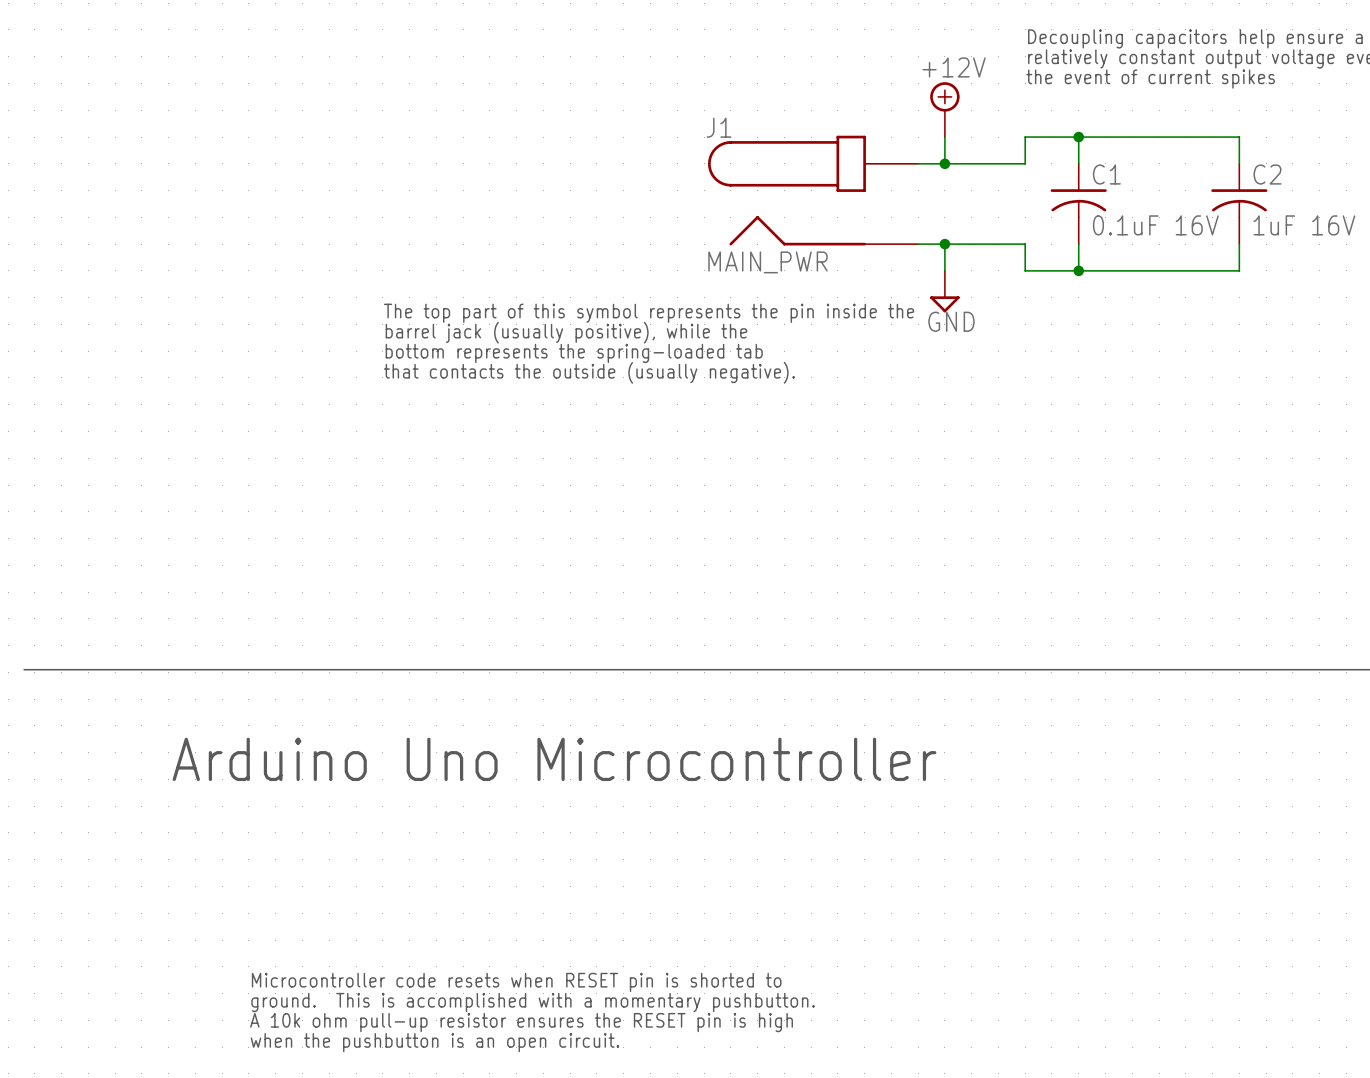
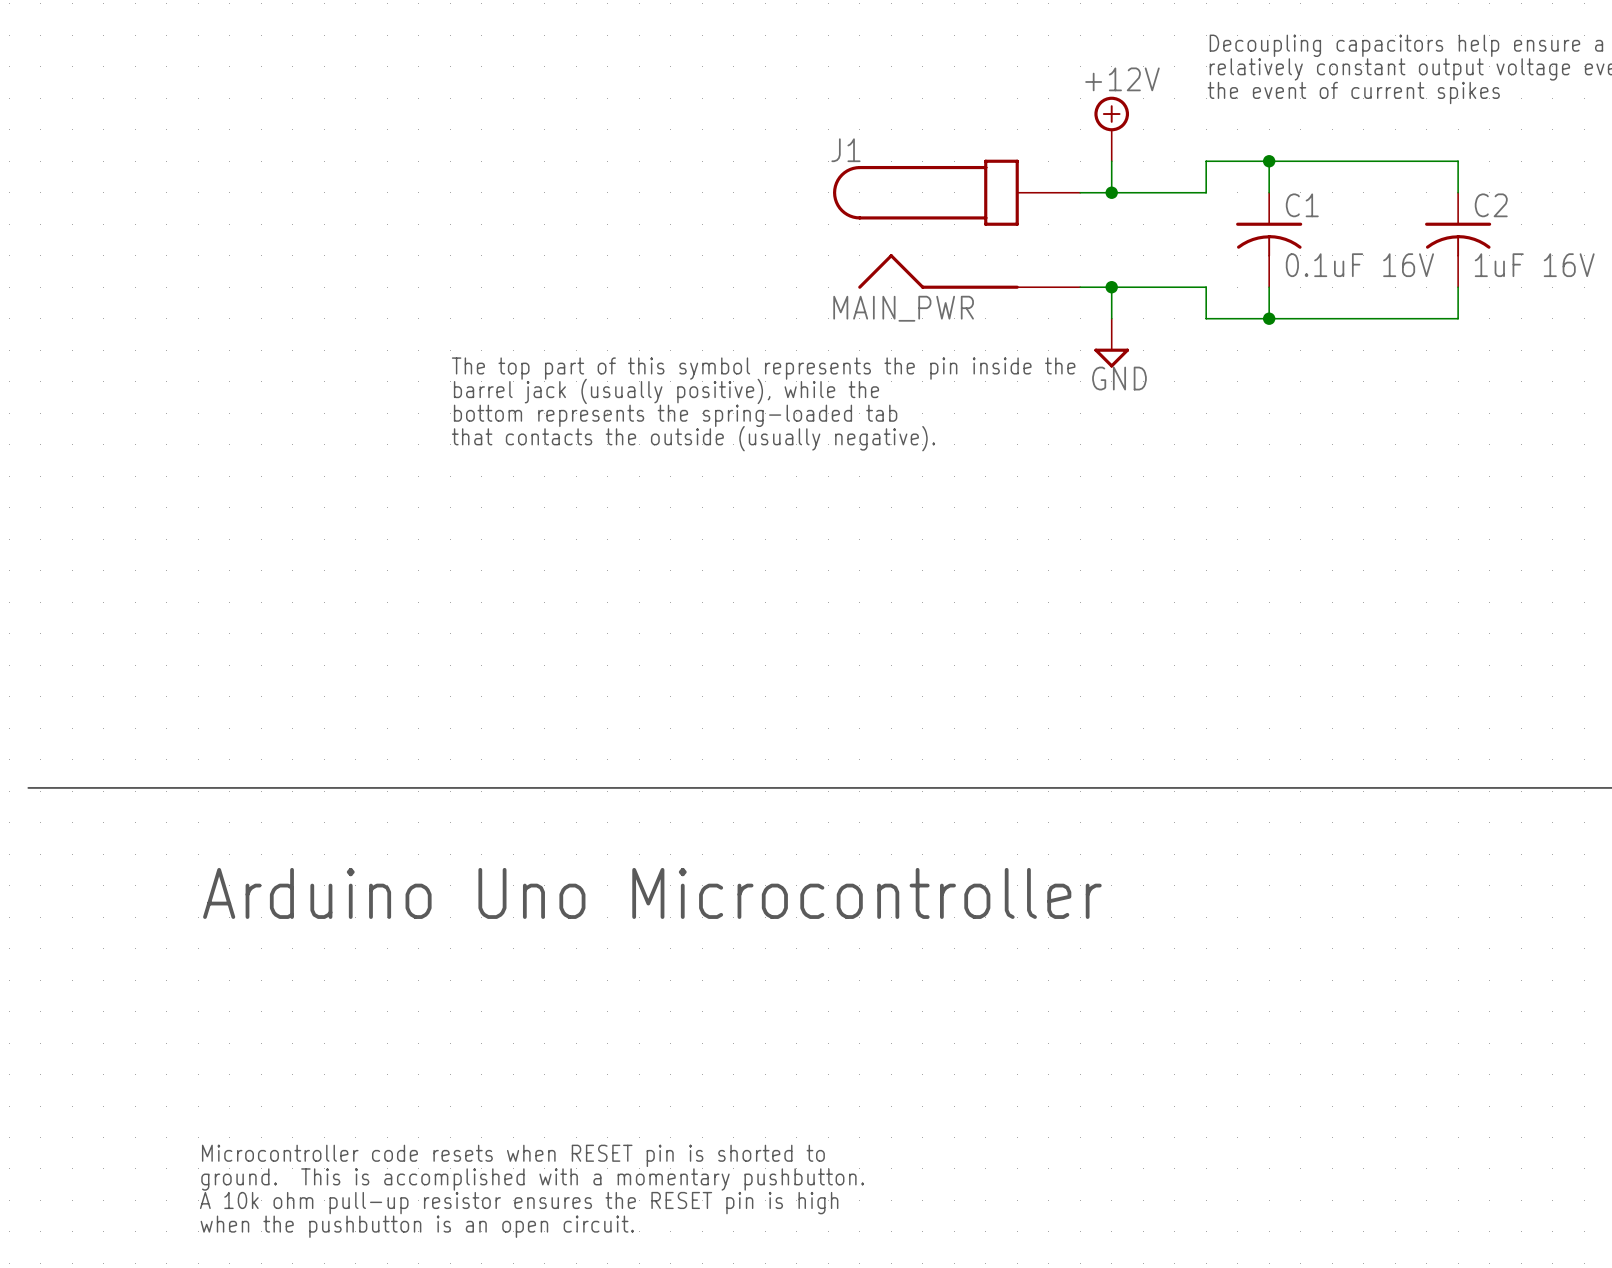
text position: Microcontroller code resets when RESET pin is shorted to (516, 982) -> Microcontroller code resets when RESET pin is shorted to (513, 1155)
text position: ground. This is accomplished with a momentary pushbutton. (533, 1002) -> ground. This is accomplished with a momentary pushbutton. (532, 1179)
text position: A 10k ohm pull-up resistor ensures the RESET pin is high (521, 1022) -> A 10k ohm pull-up resistor ensures the RESET pin is high (519, 1203)
text position: when the pushbutton is an open circuit. (434, 1042) -> when the pushbutton is an open circuit. (417, 1226)

